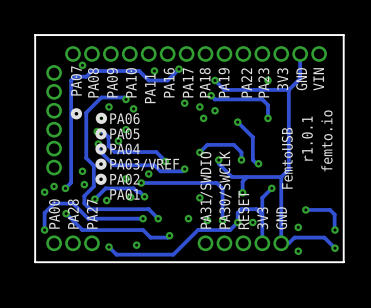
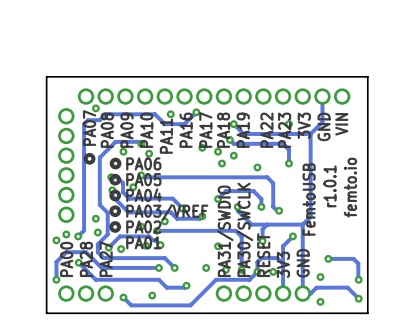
track: (237, 122) (247, 131) -> (141, 175) (143, 177) (267, 177)

